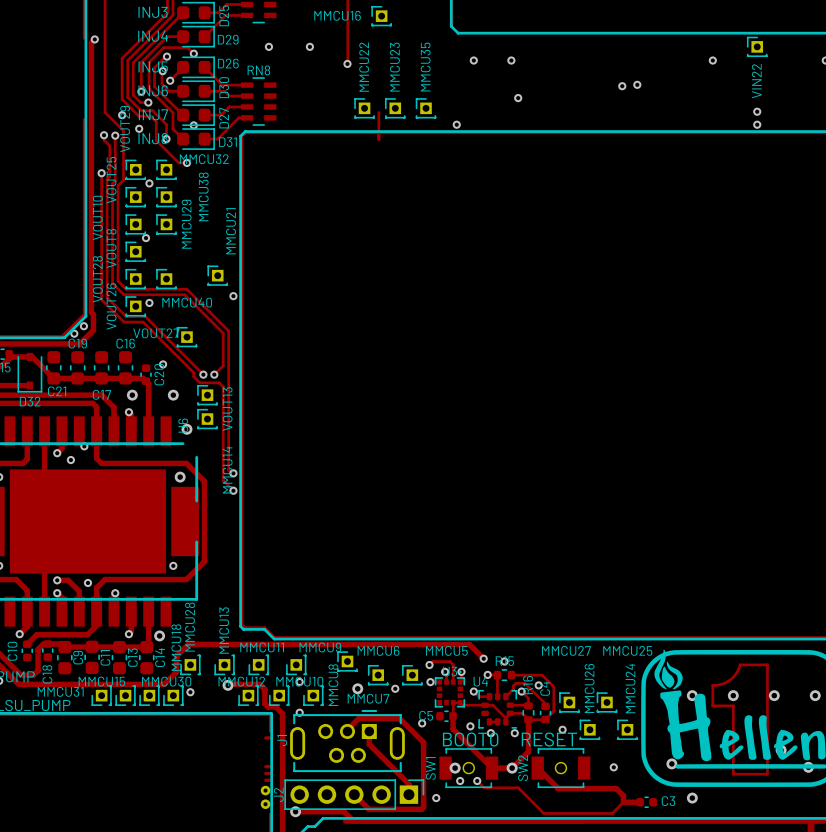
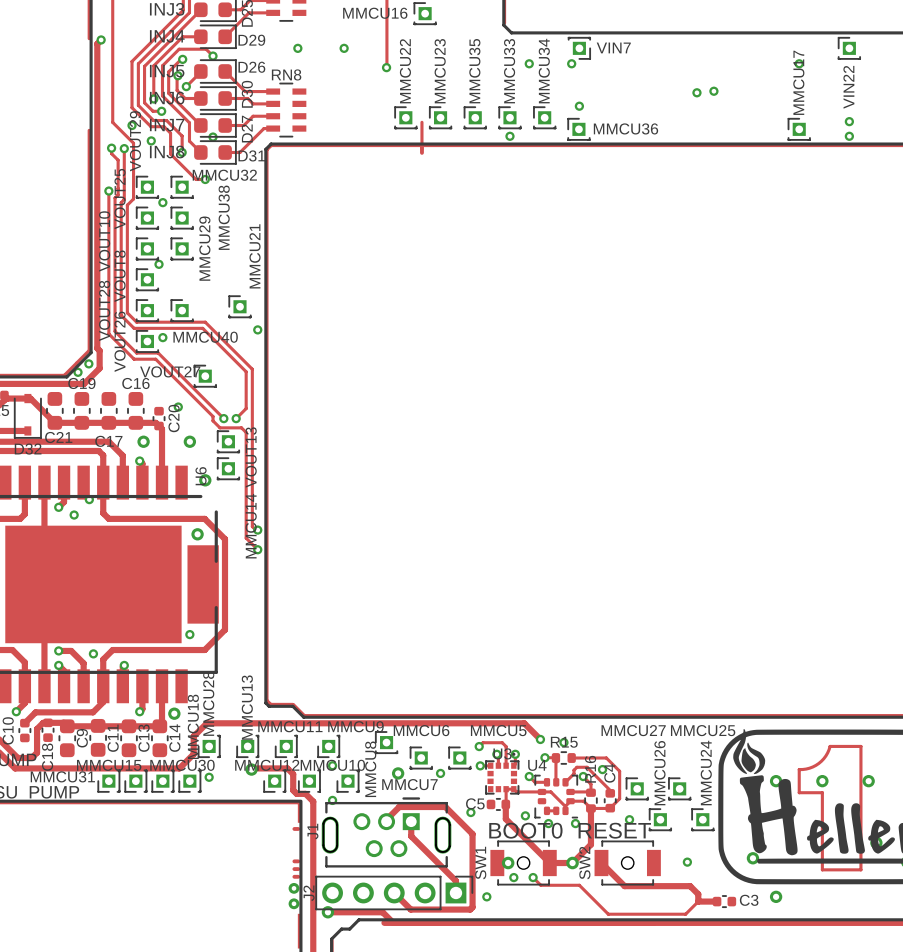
VIN7: none -> (579, 48)
MMCU33: none -> (509, 117)
MMCU34: none -> (544, 117)
MMCU36: none -> (578, 129)
MMCU17: none -> (799, 129)

